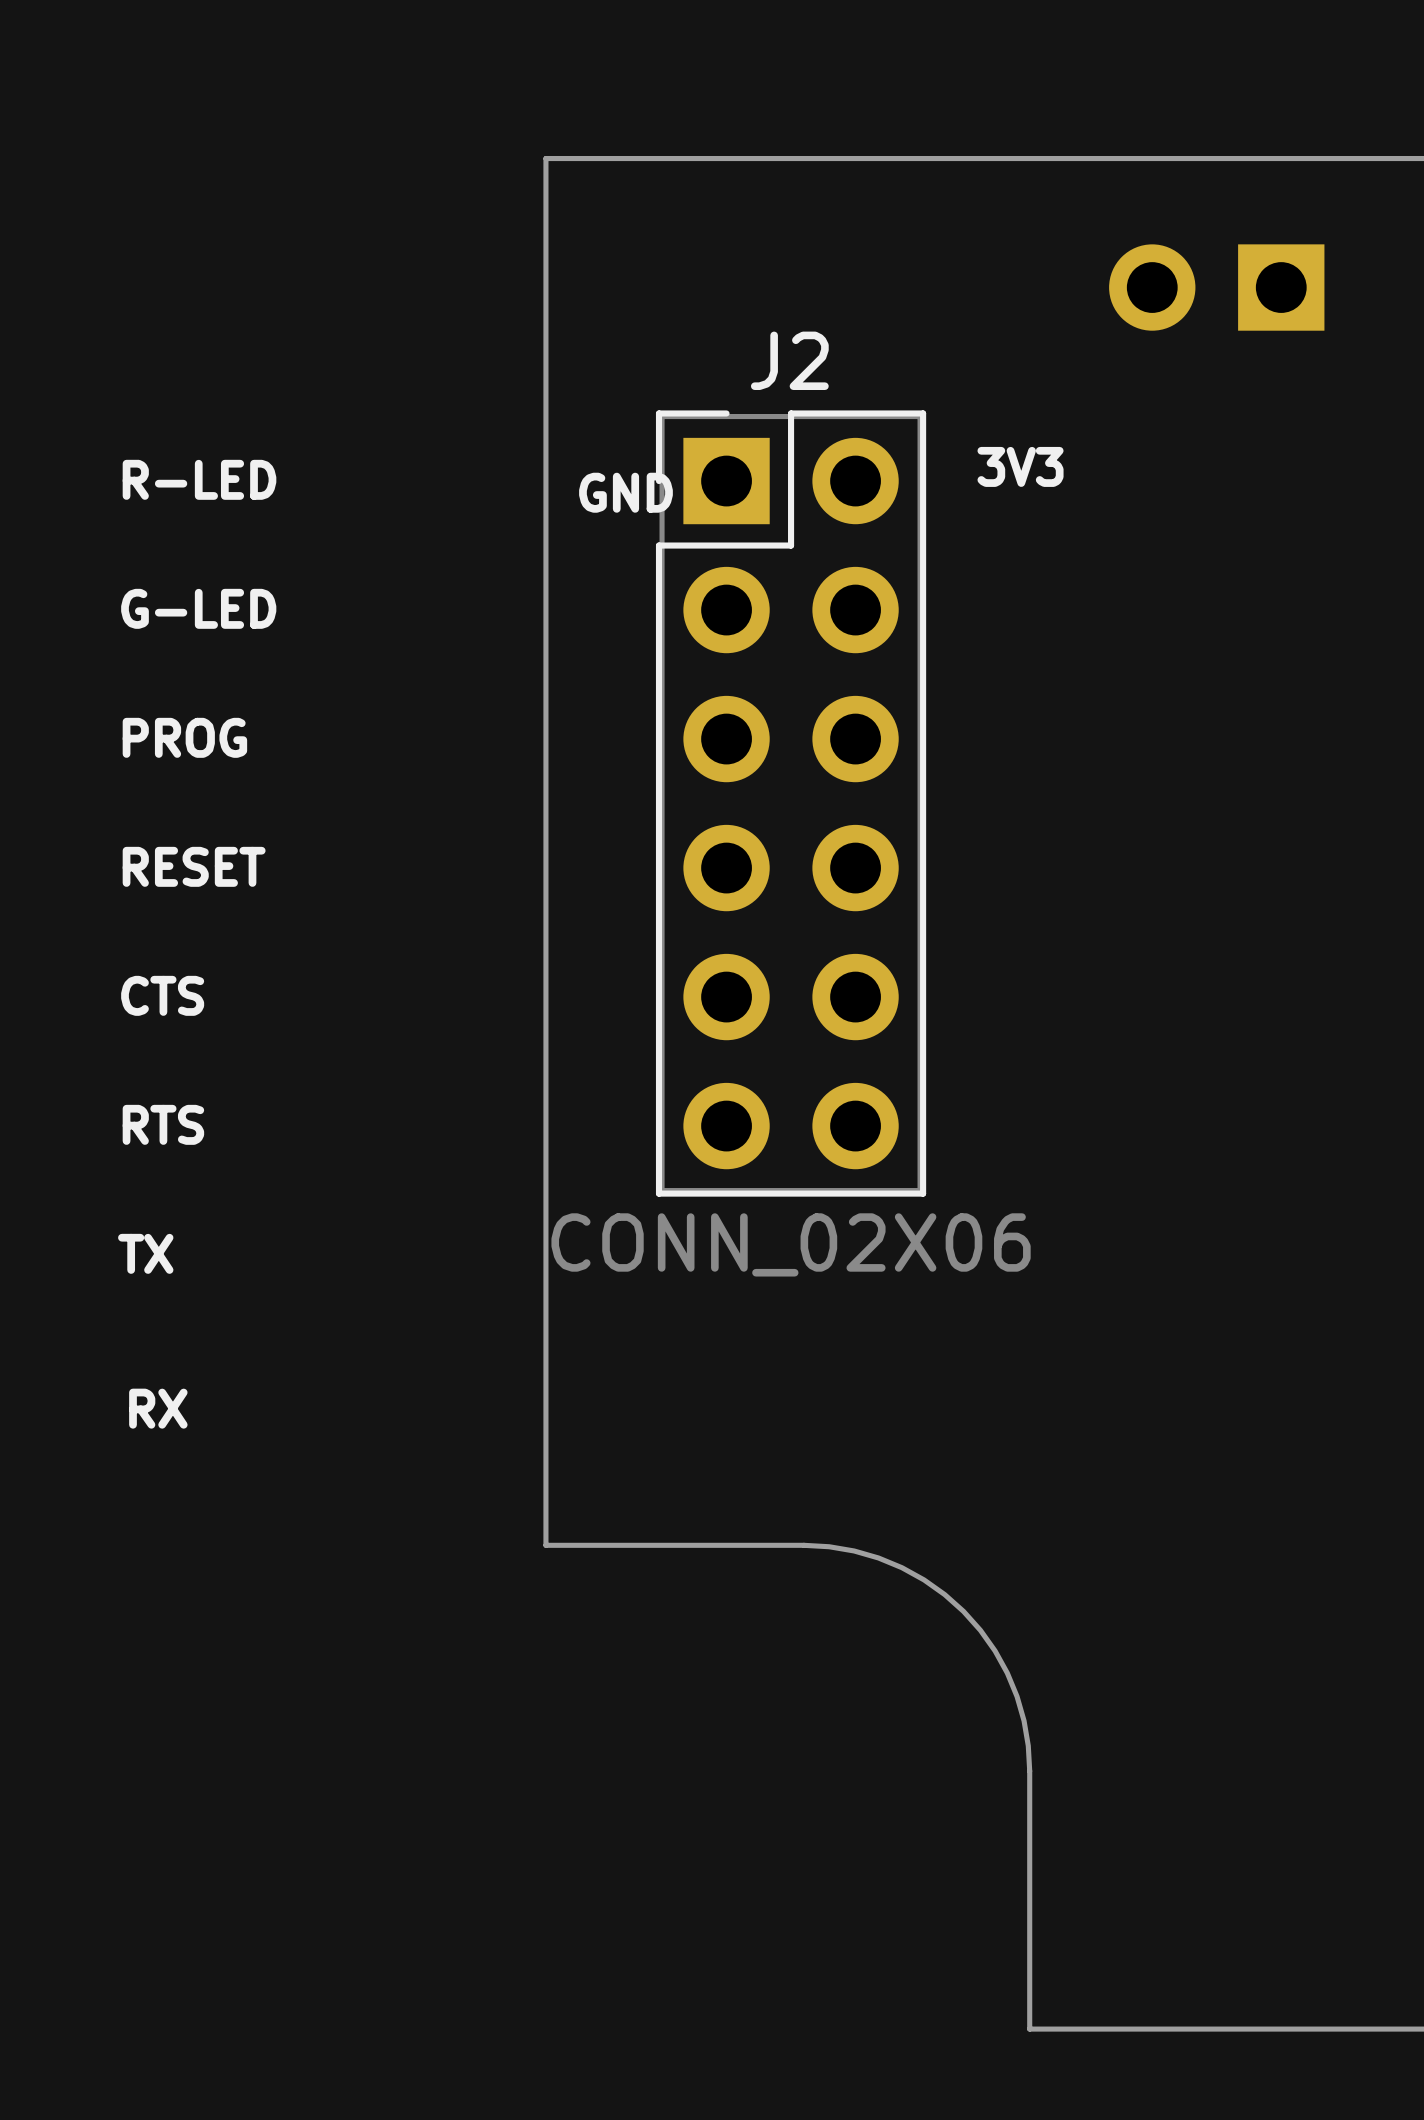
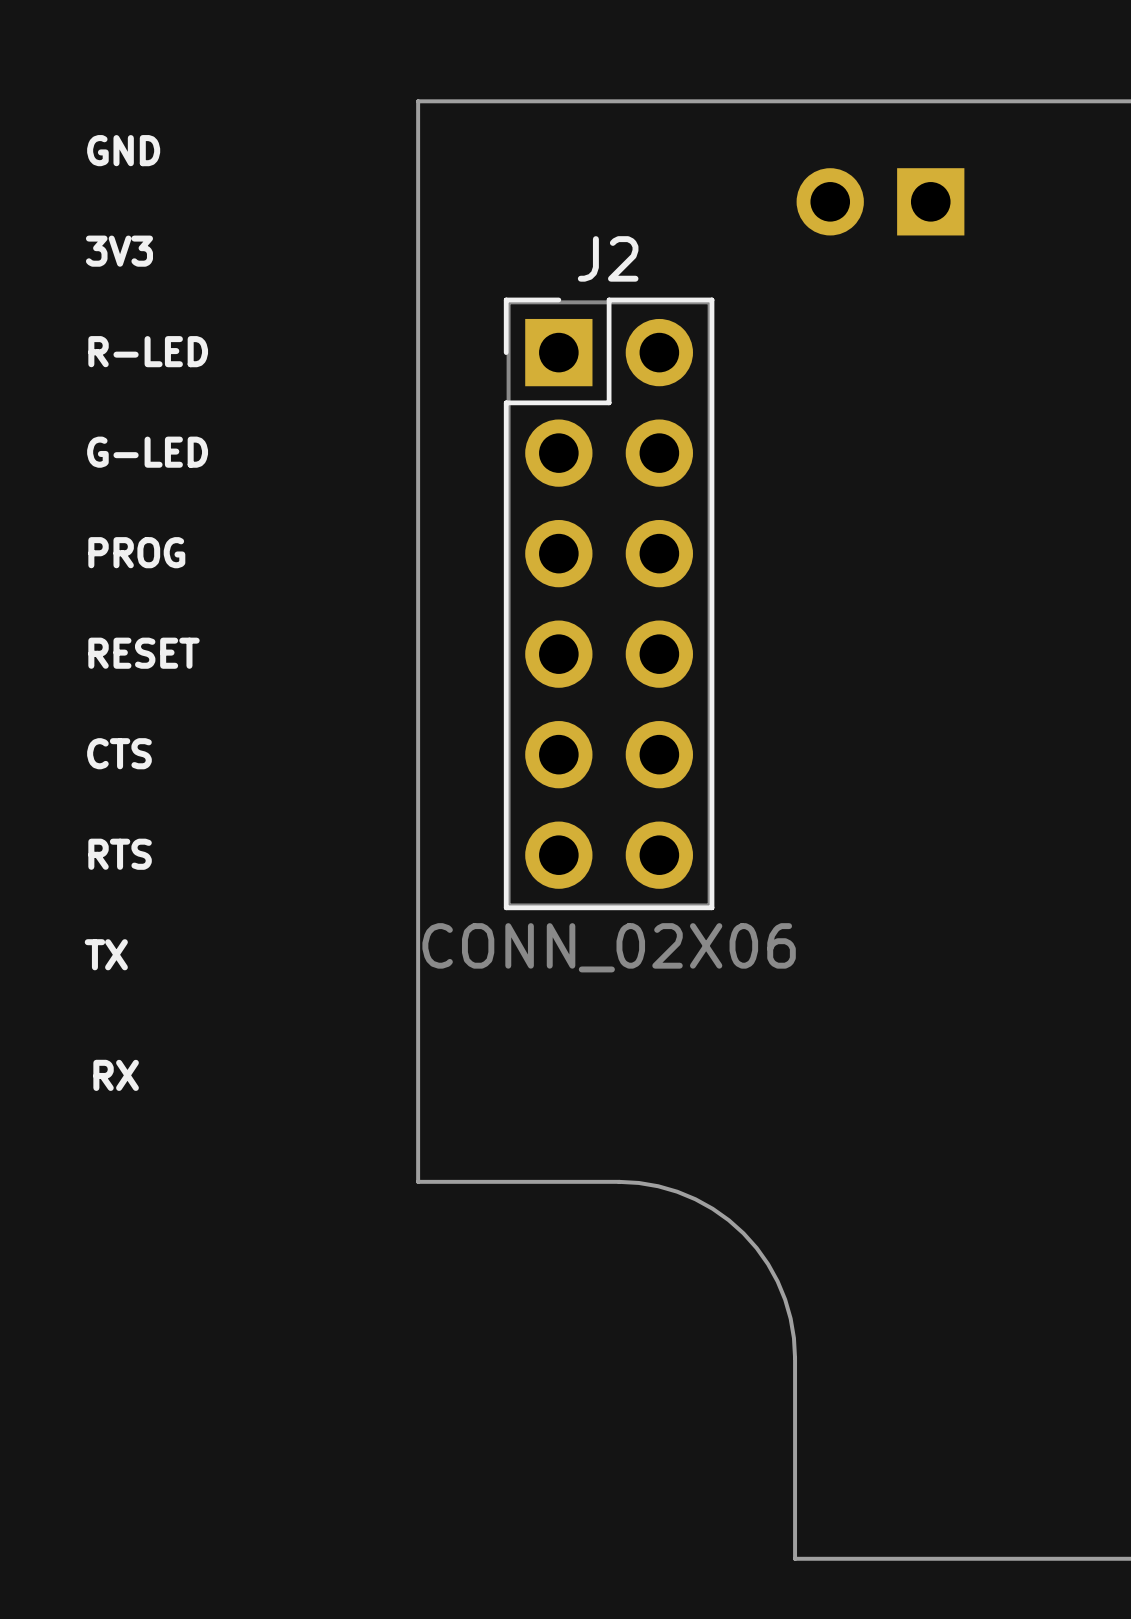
part position: (1216, 287) -> (880, 201)
text position: 3V3 (1020, 466) -> 3V3 (119, 251)
text position: GND (625, 492) -> GND (123, 150)

